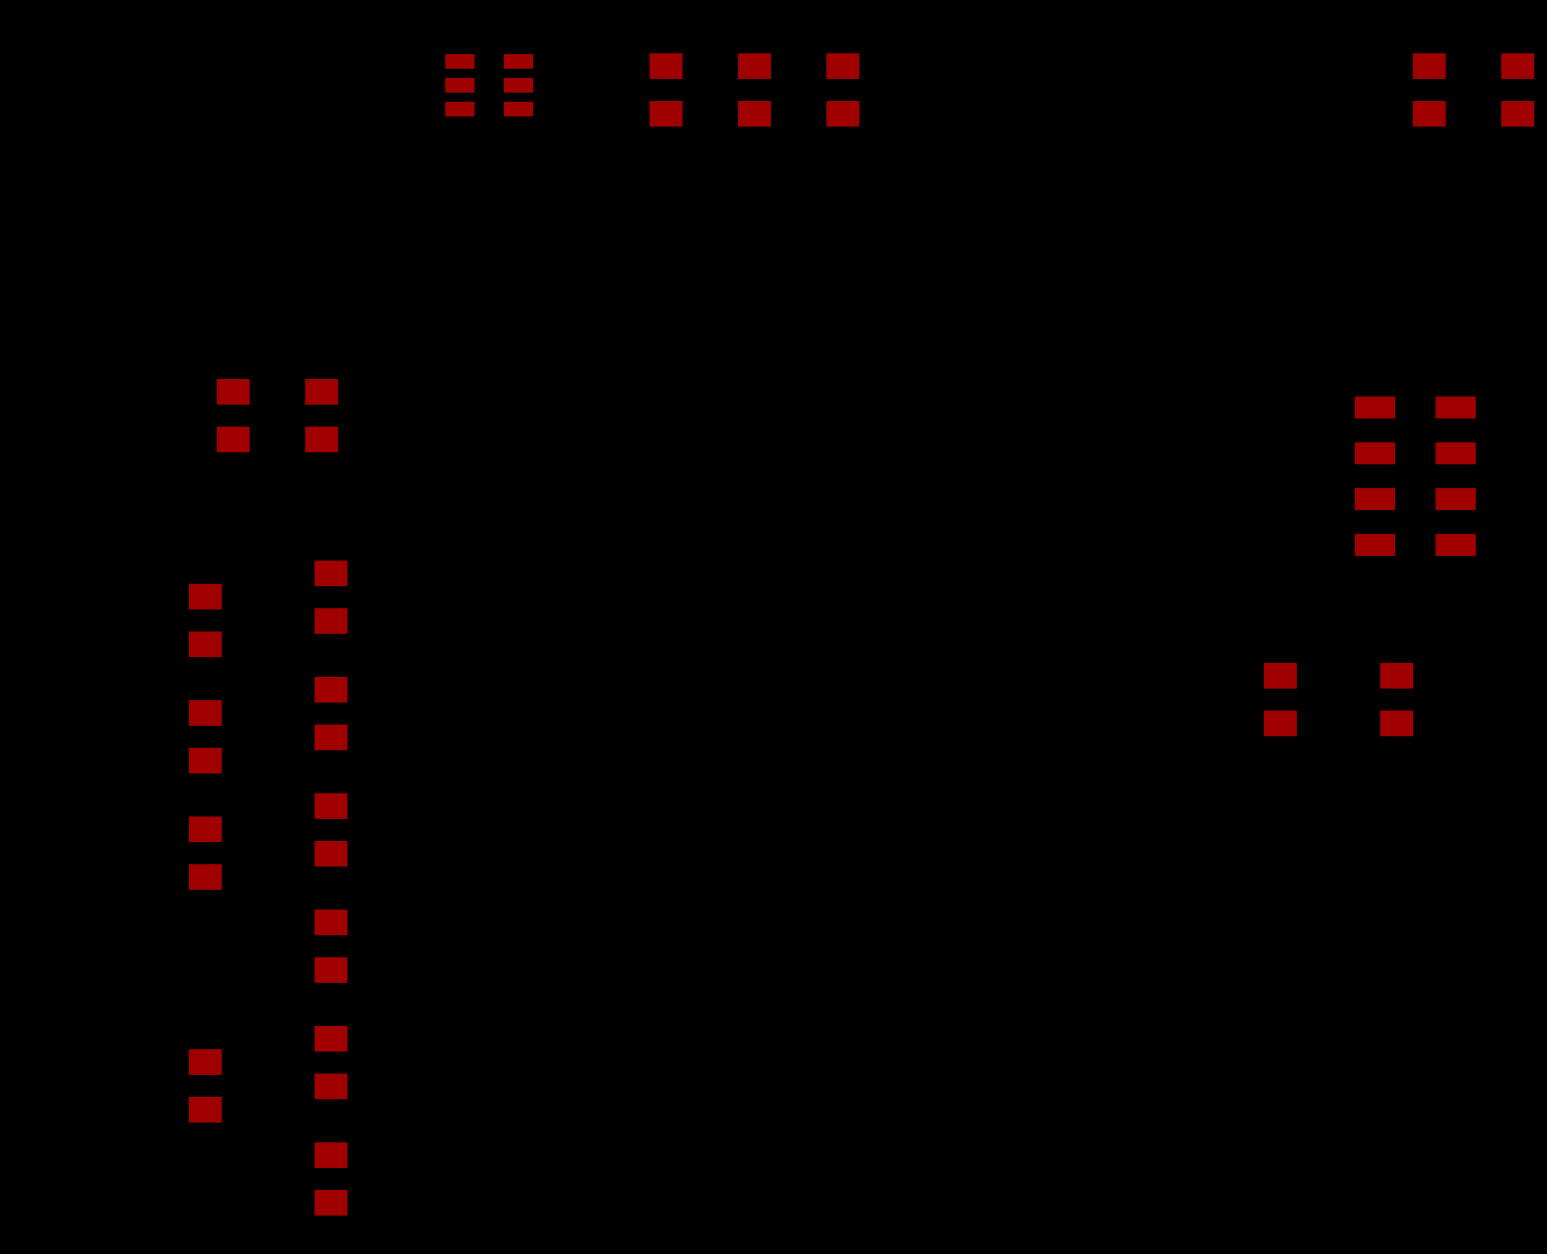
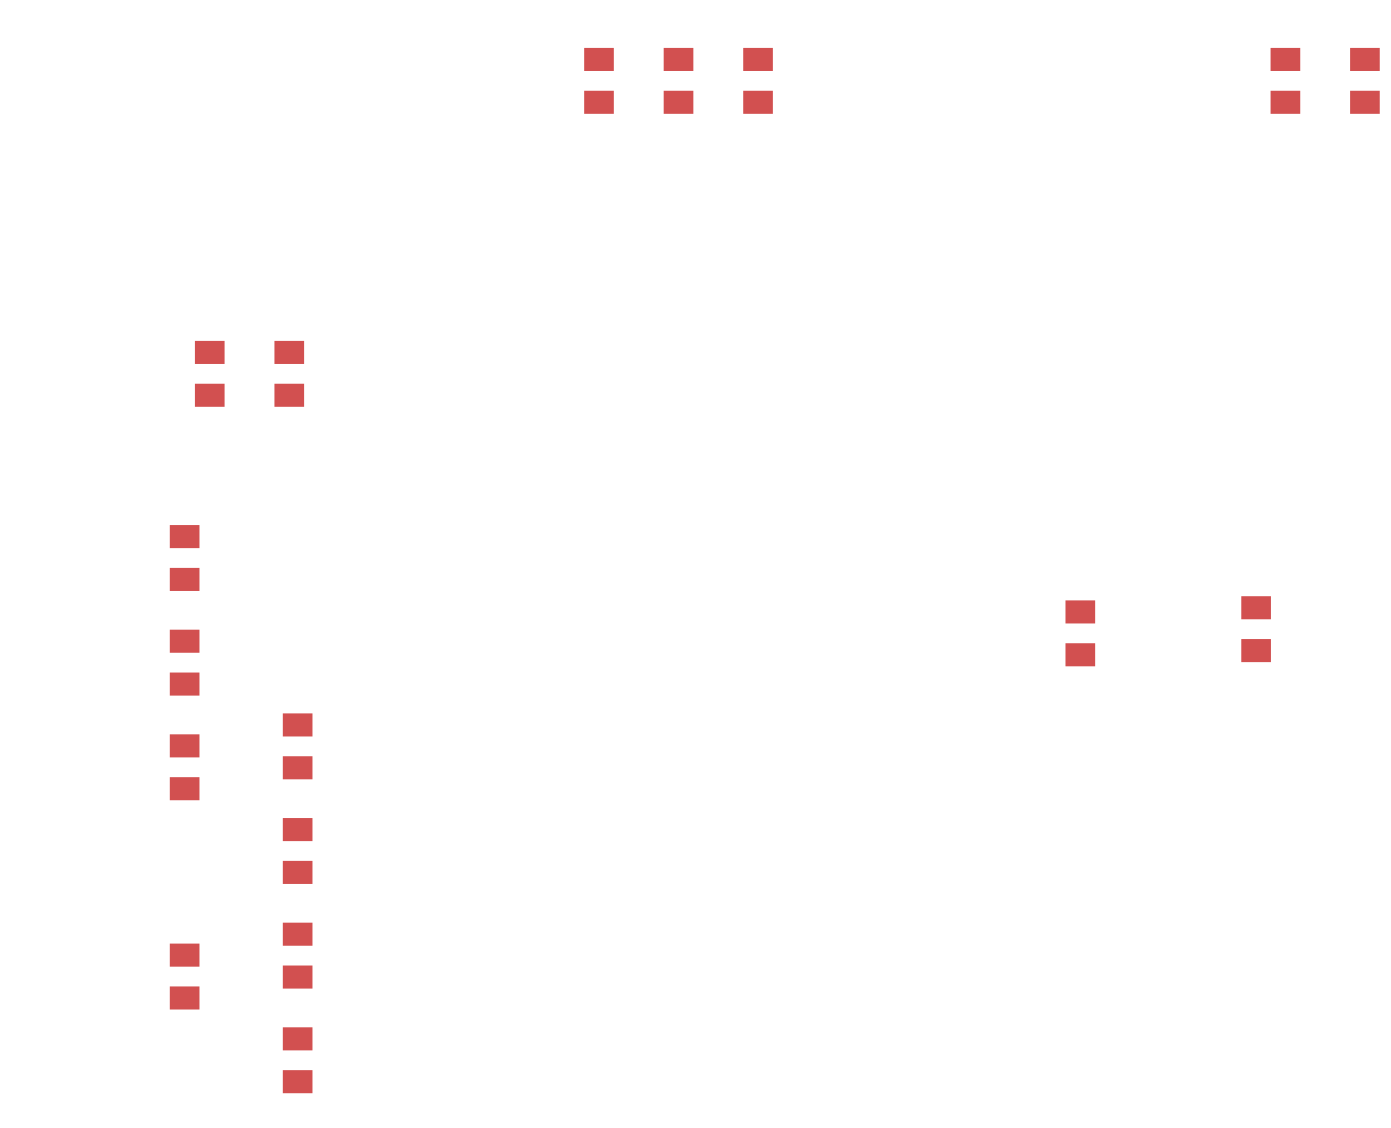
part: (489, 85) -> none
part: (1415, 476) -> none
part: (330, 597) -> none
part position: (1280, 699) -> (1080, 633)
part: (330, 713) -> none

